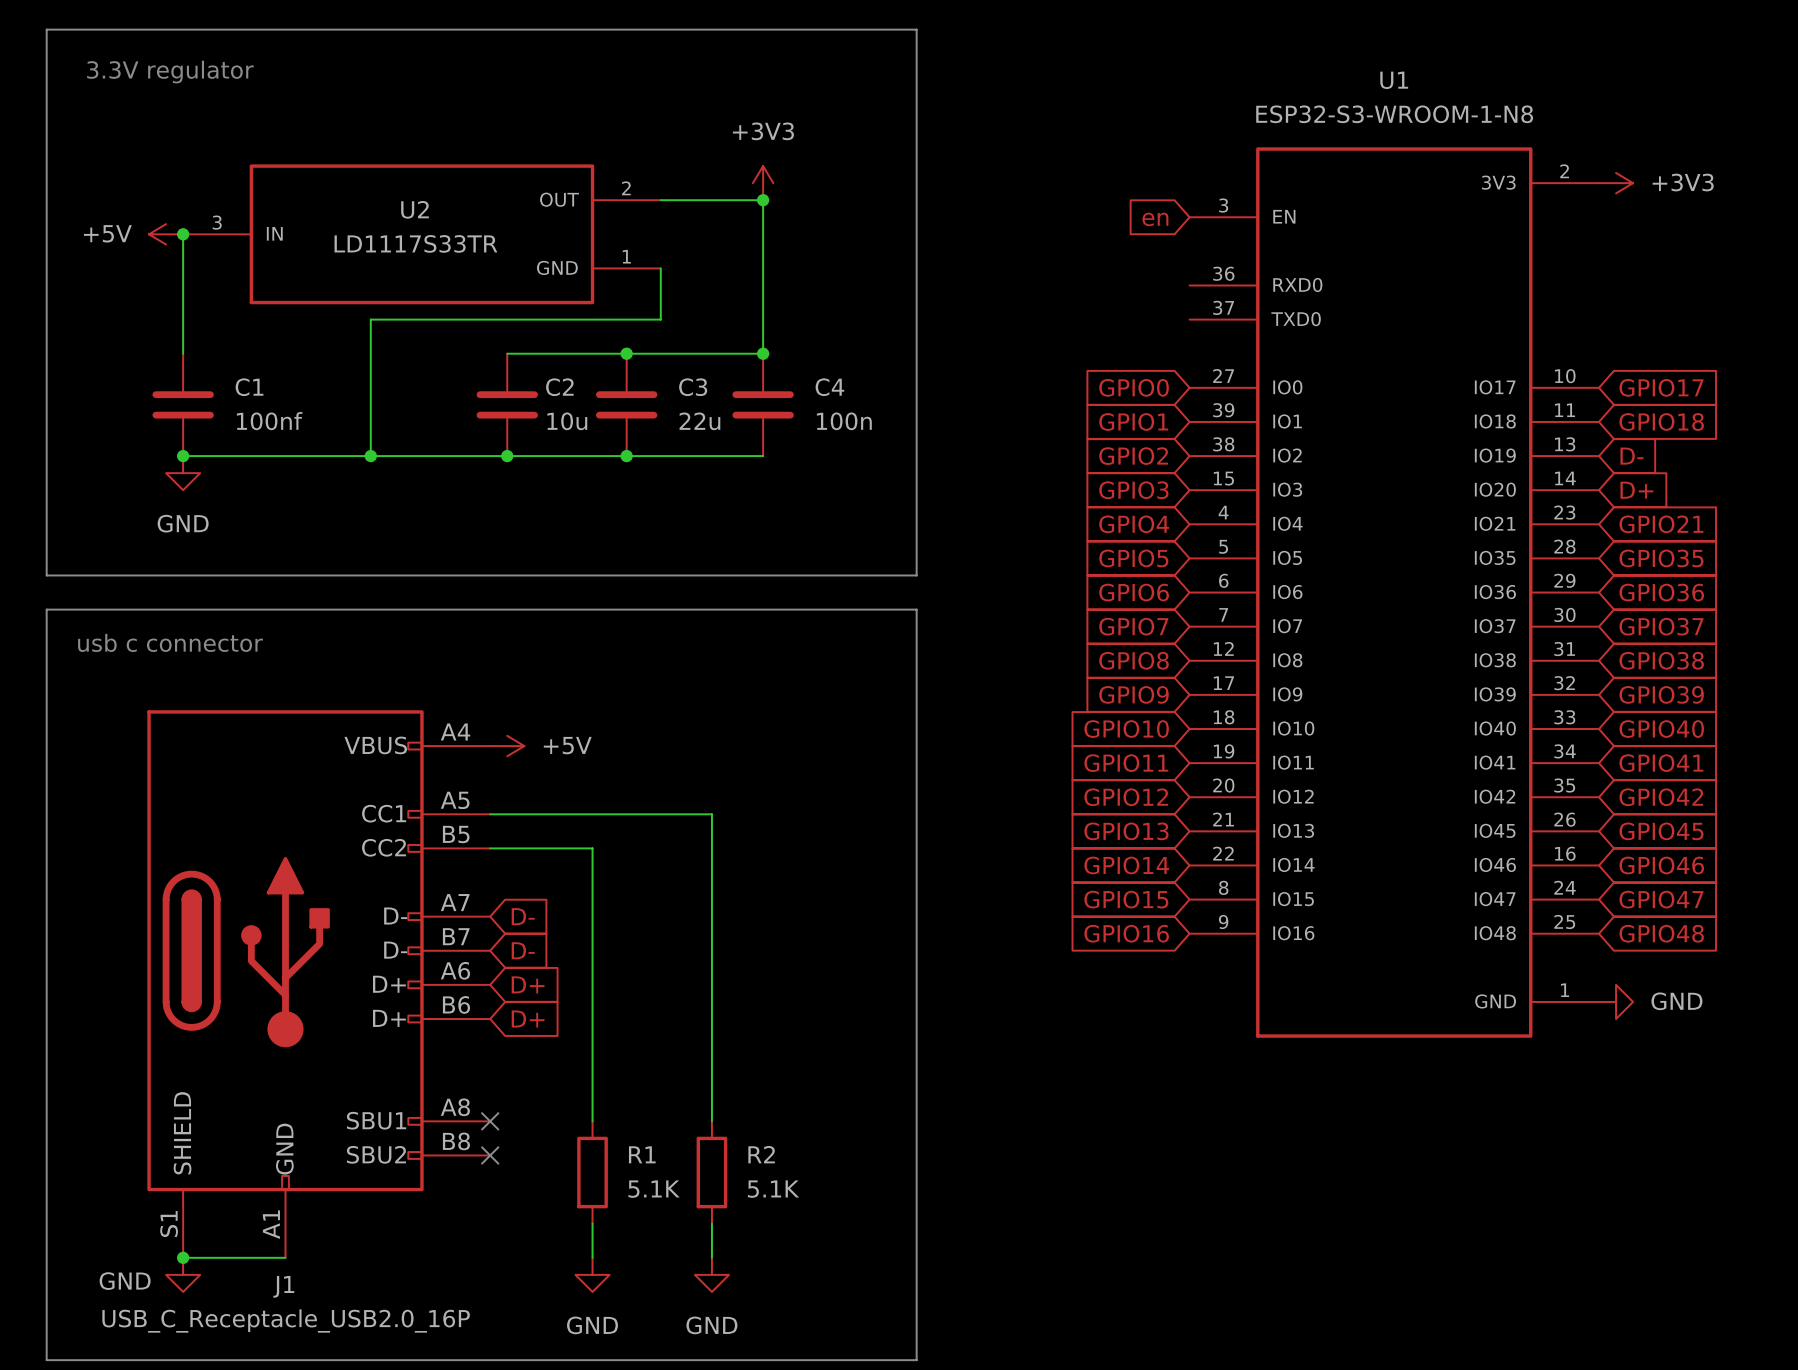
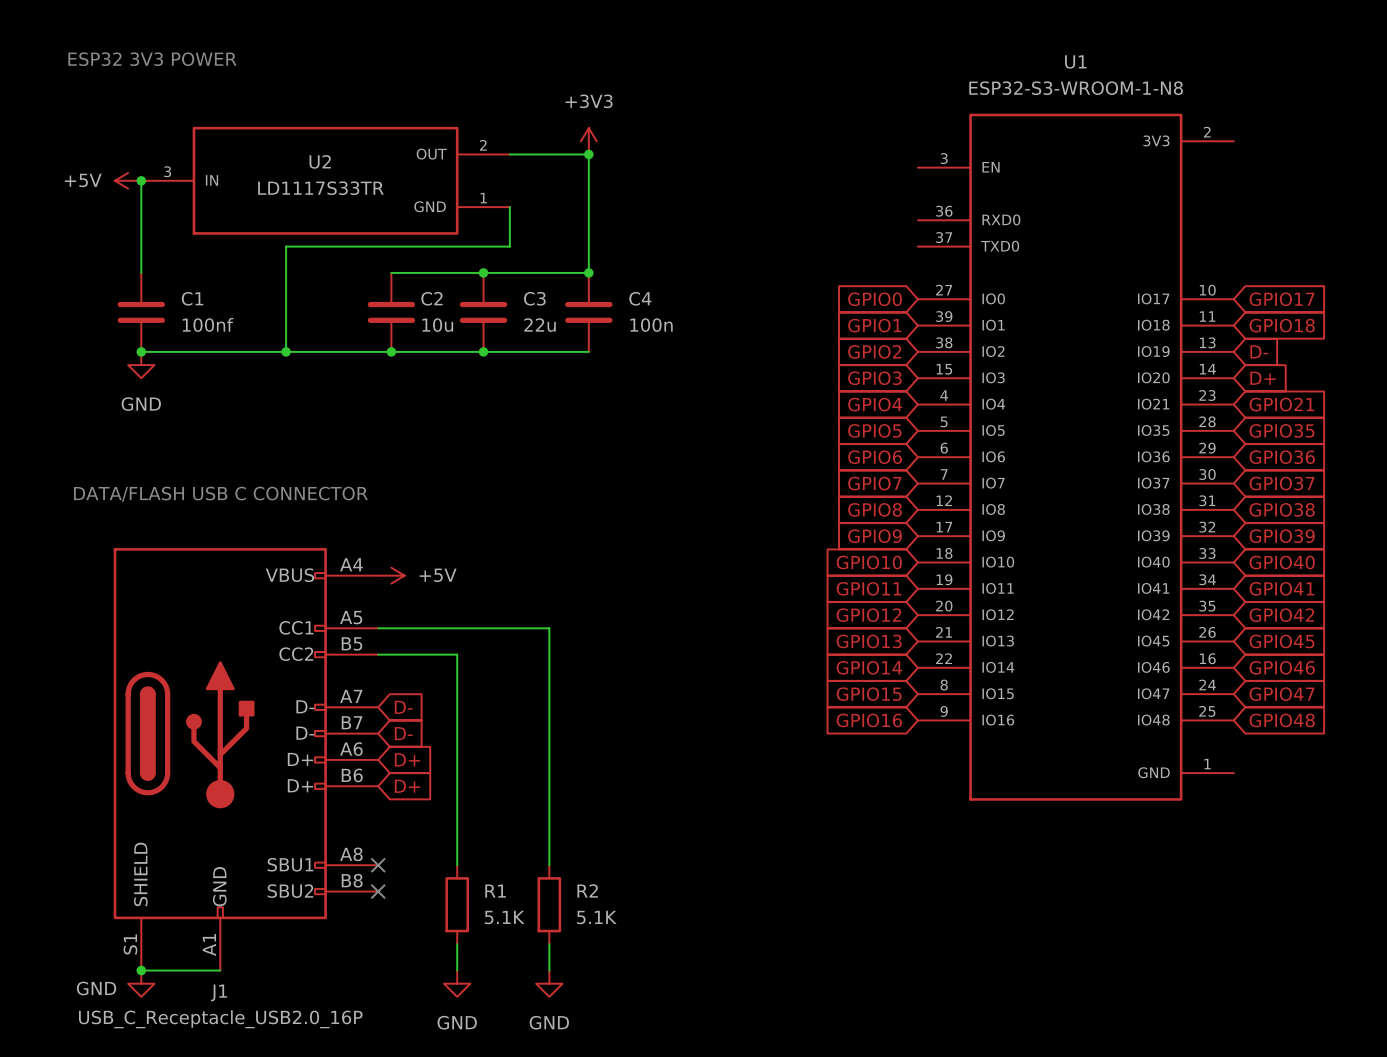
line: (46, 29) (46, 575) (916, 575) (916, 29) (46, 29) -> none
text: 3.3V regulator (170, 72) -> none
text: none -> ESP32 3V3 POWER (152, 59)
power symbol: +3V3 (1616, 183) -> none
global label: en (1155, 219) -> none
line: (46, 609) (46, 1360) (916, 1360) (916, 609) (46, 609) -> none
text: none -> DATA/FLASH USB C CONNECTOR (220, 494)
text: usb c connector (170, 642) -> none
power symbol: GND (1616, 1001) -> none

